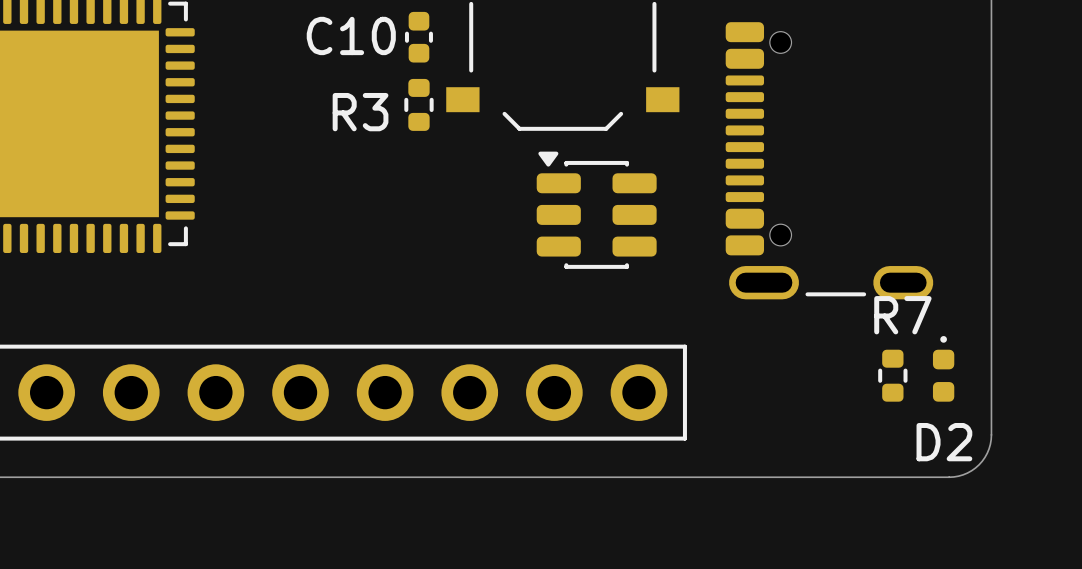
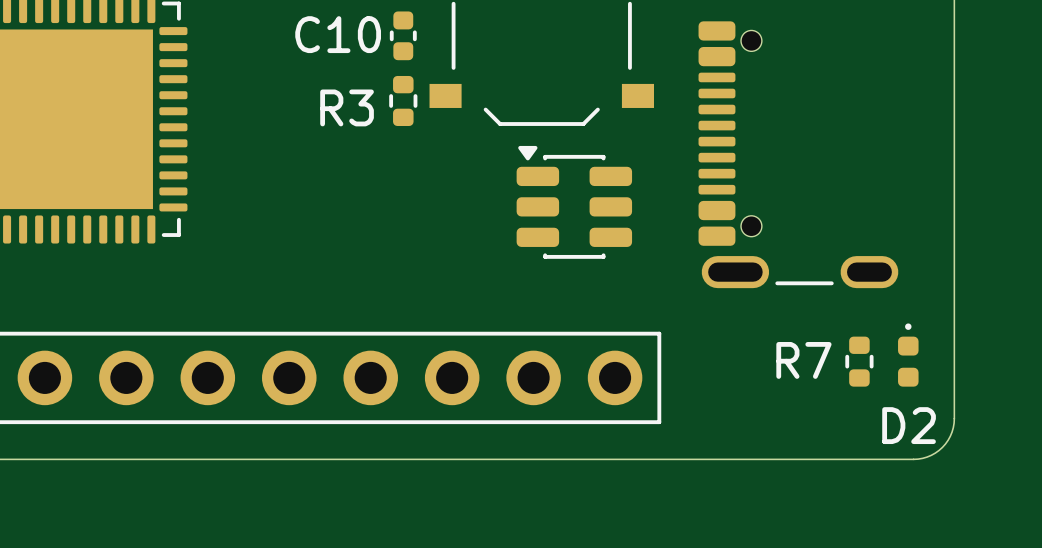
R7 name position: R7 (902, 315) -> R7 (803, 360)

